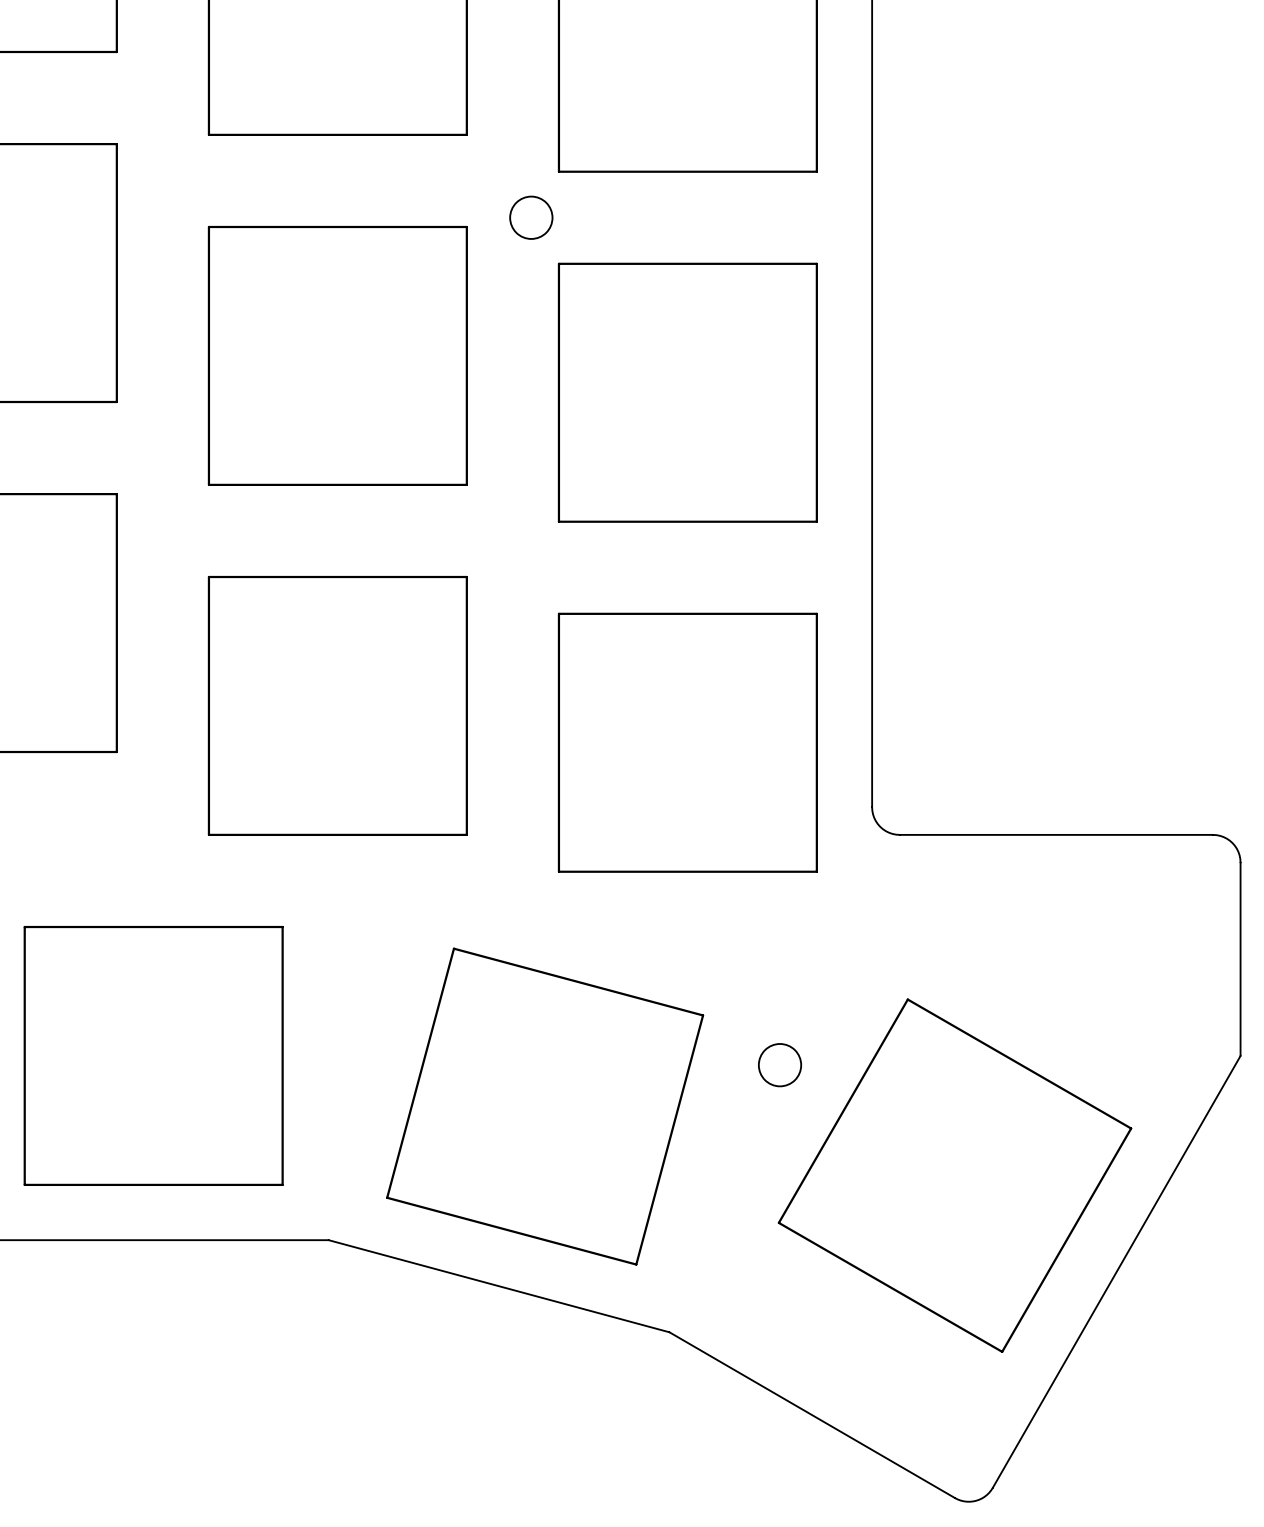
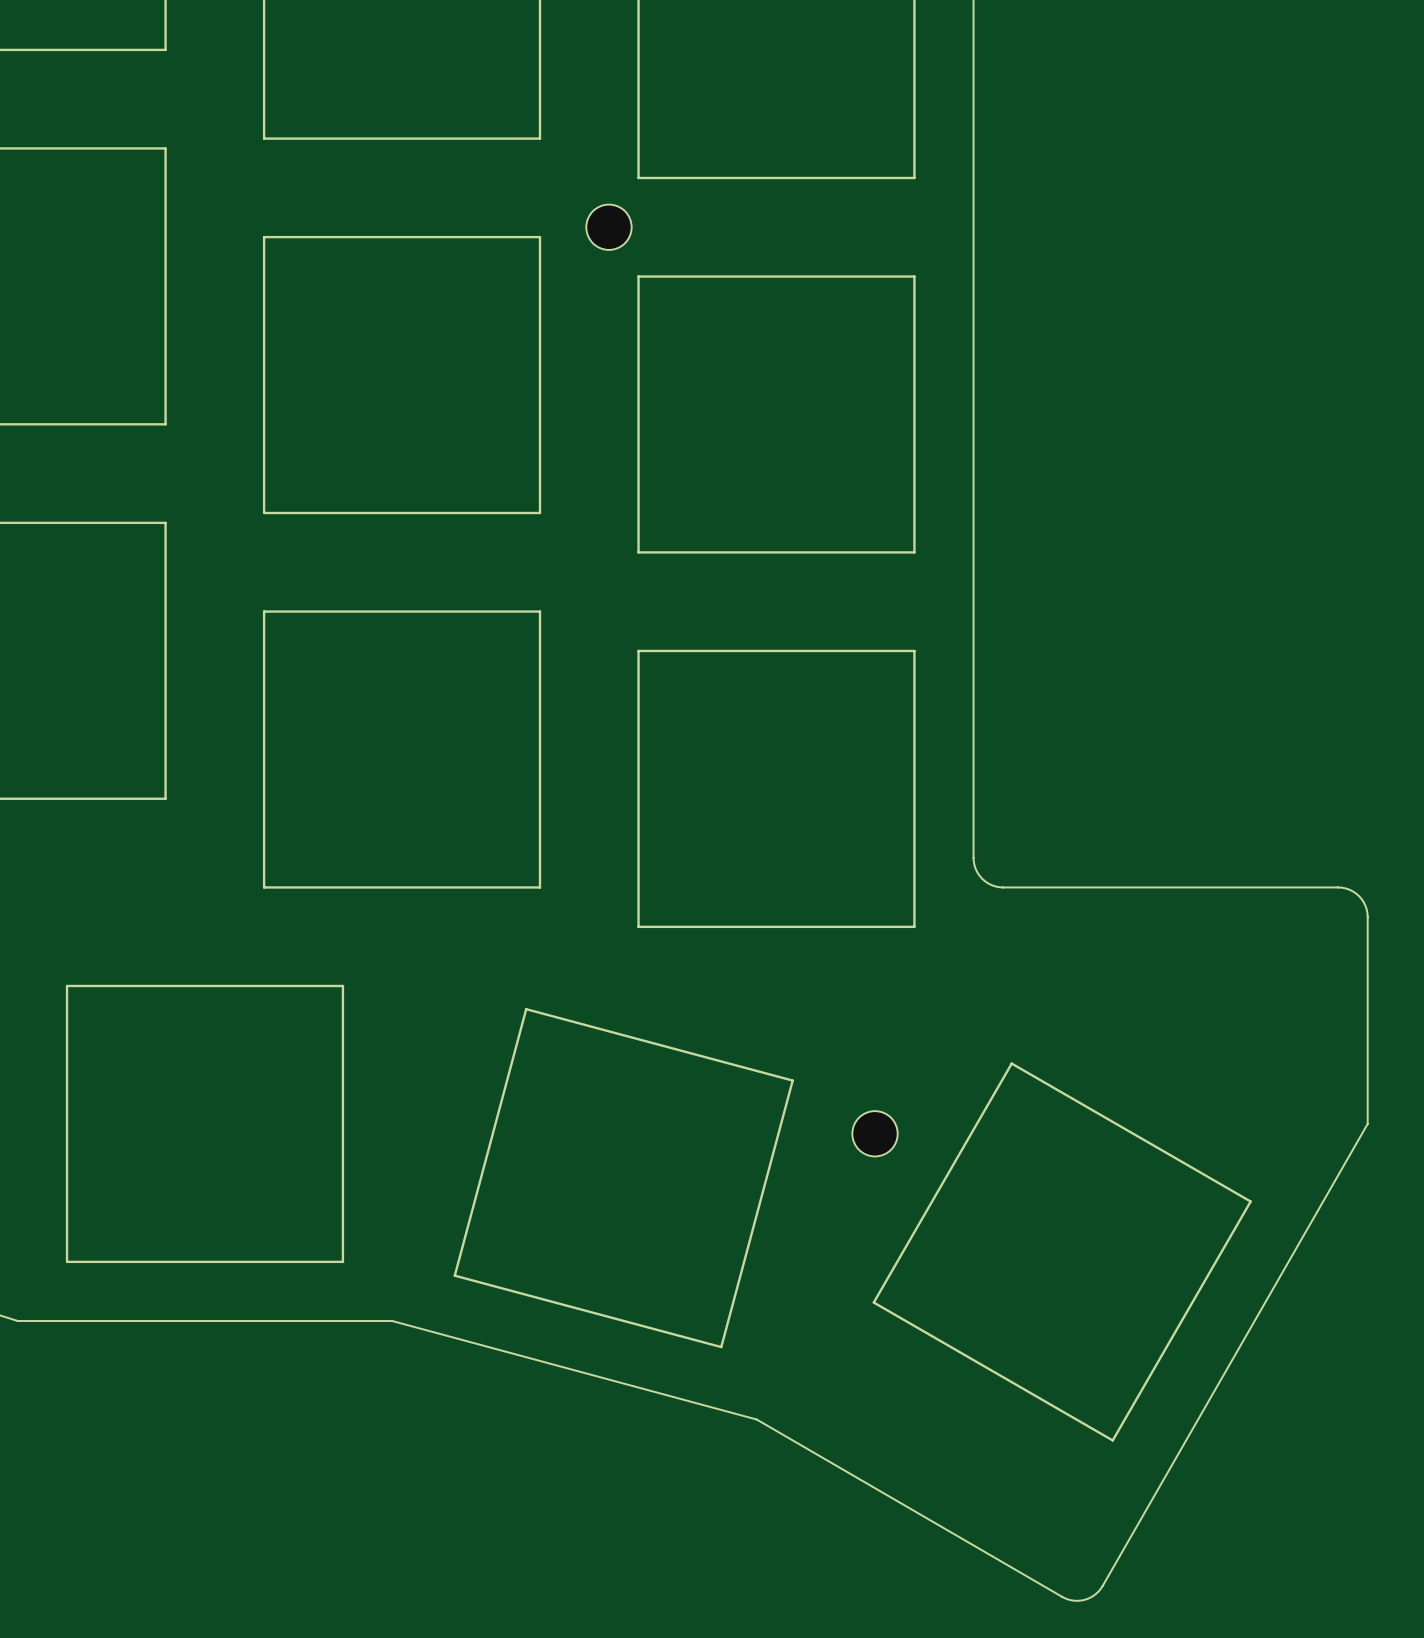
drawing: [509, 195, 554, 240] -> none
part: none -> (608, 227)
drawing: [757, 1043, 803, 1088] -> none
part: none -> (875, 1133)

